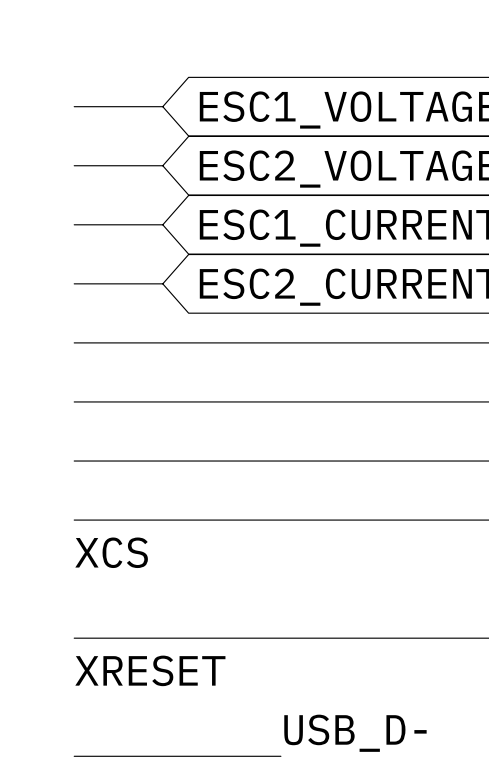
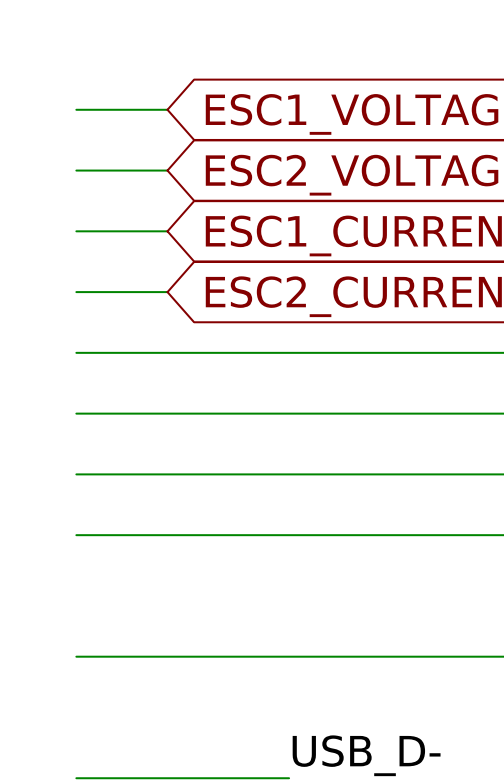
label: XCS (111, 552) -> none
label: XRESET (150, 670) -> none

